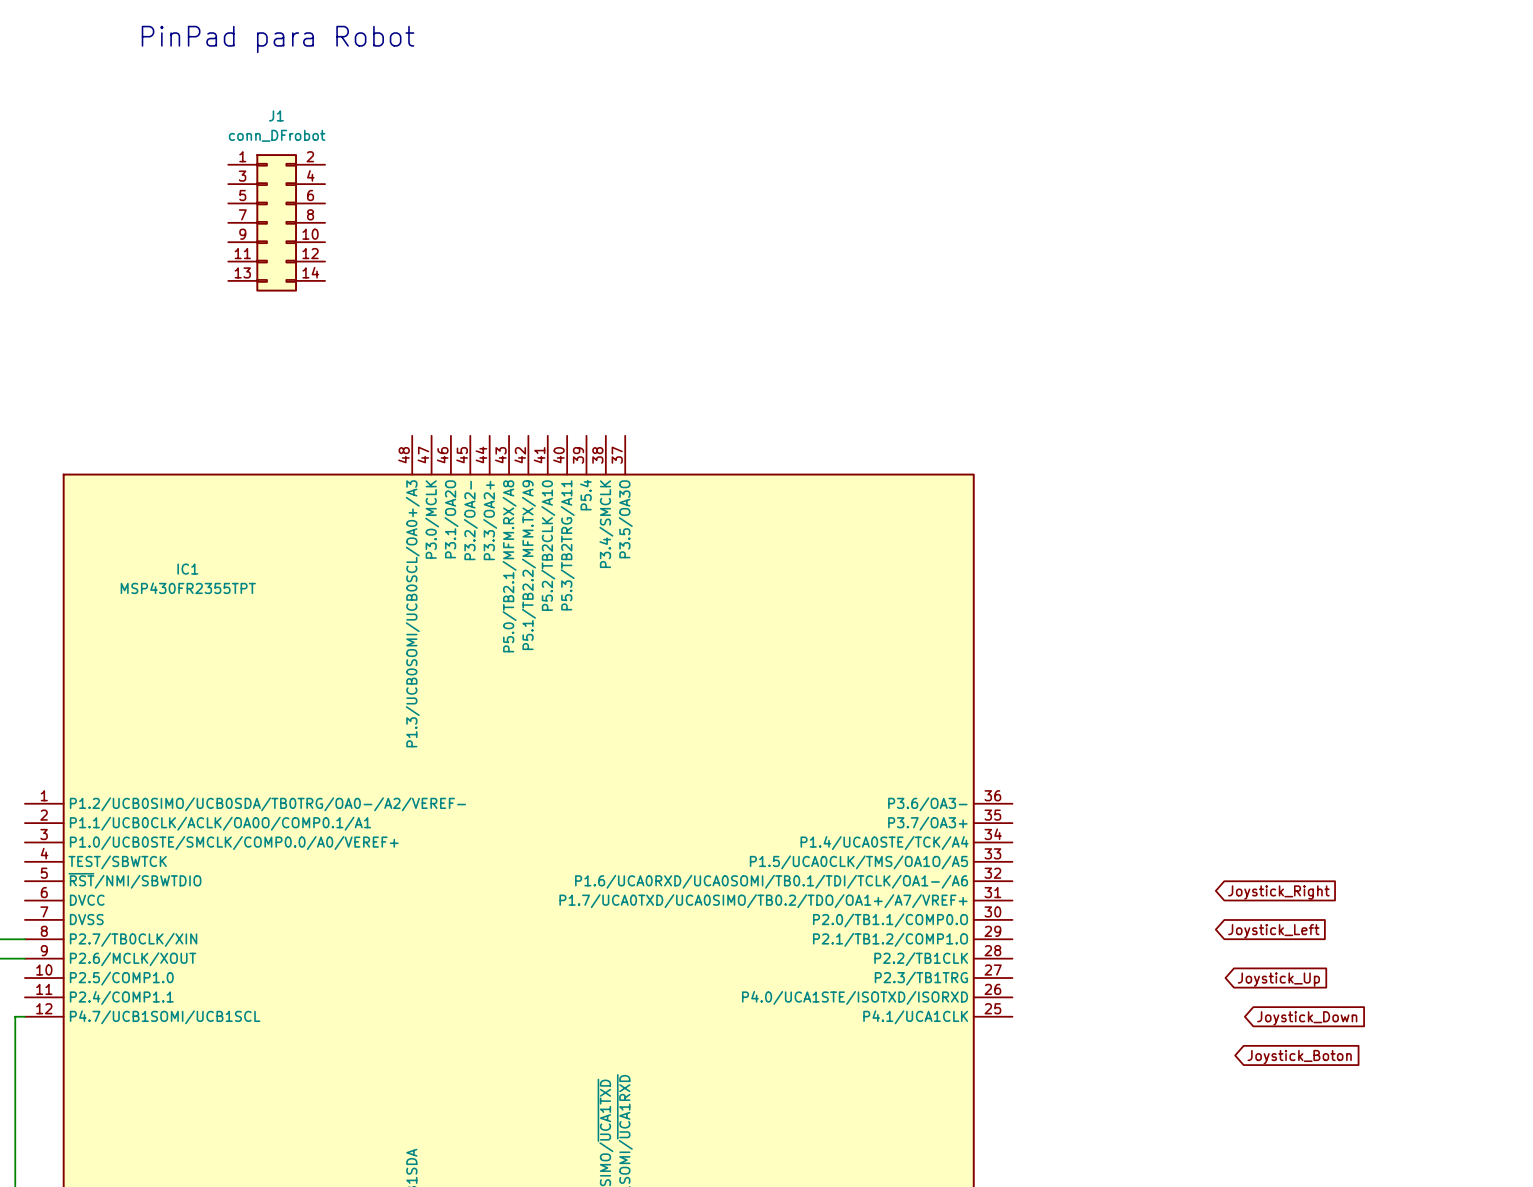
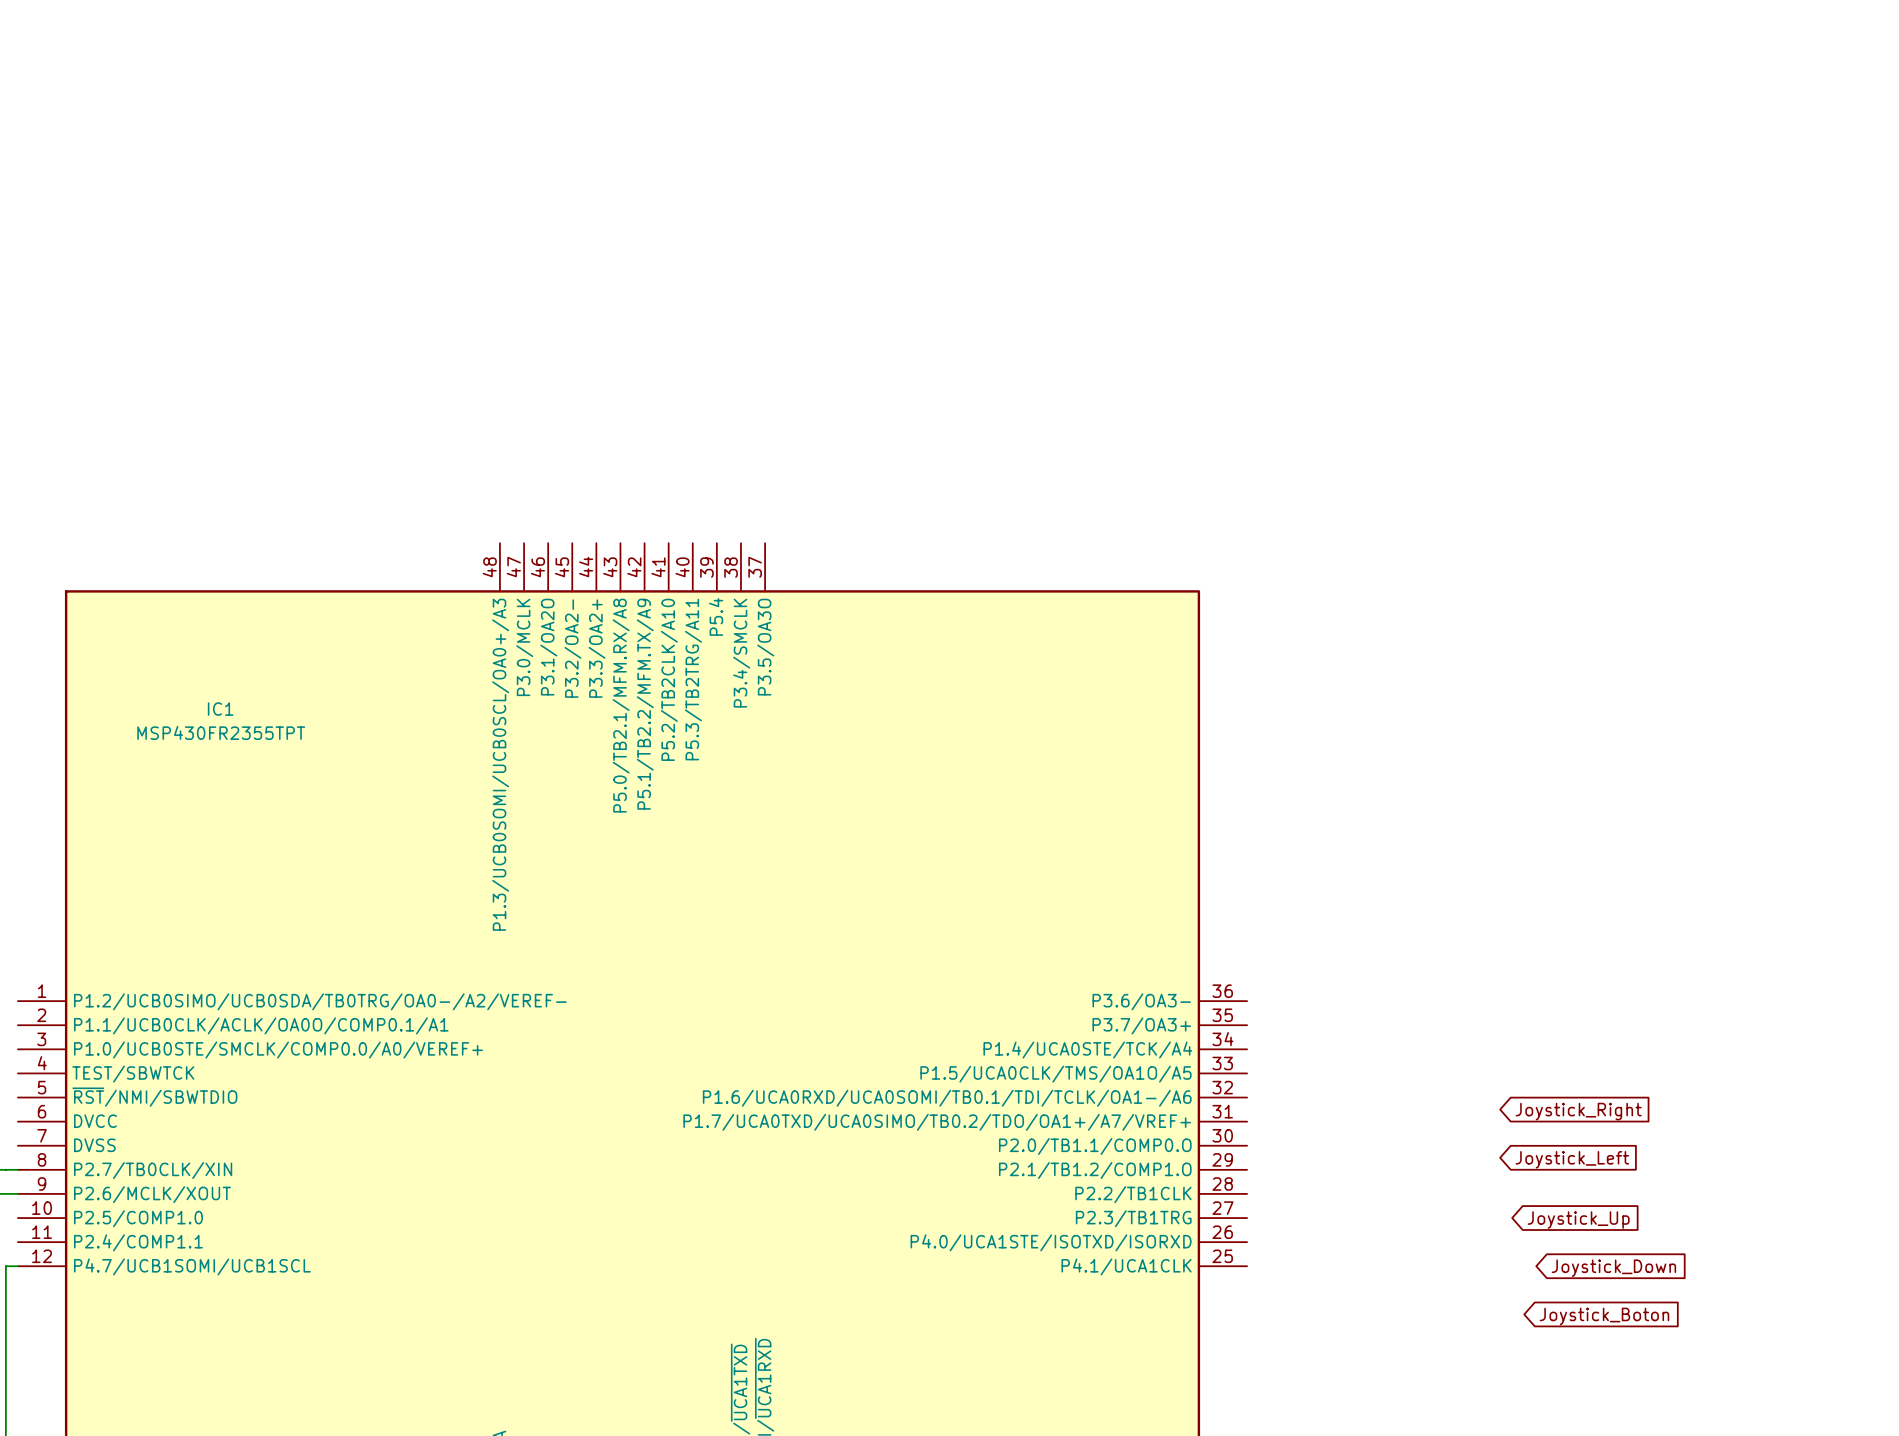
text: PinPad para Robot (278, 39) -> none
J1: conn_DFrobot (276, 222) -> none

